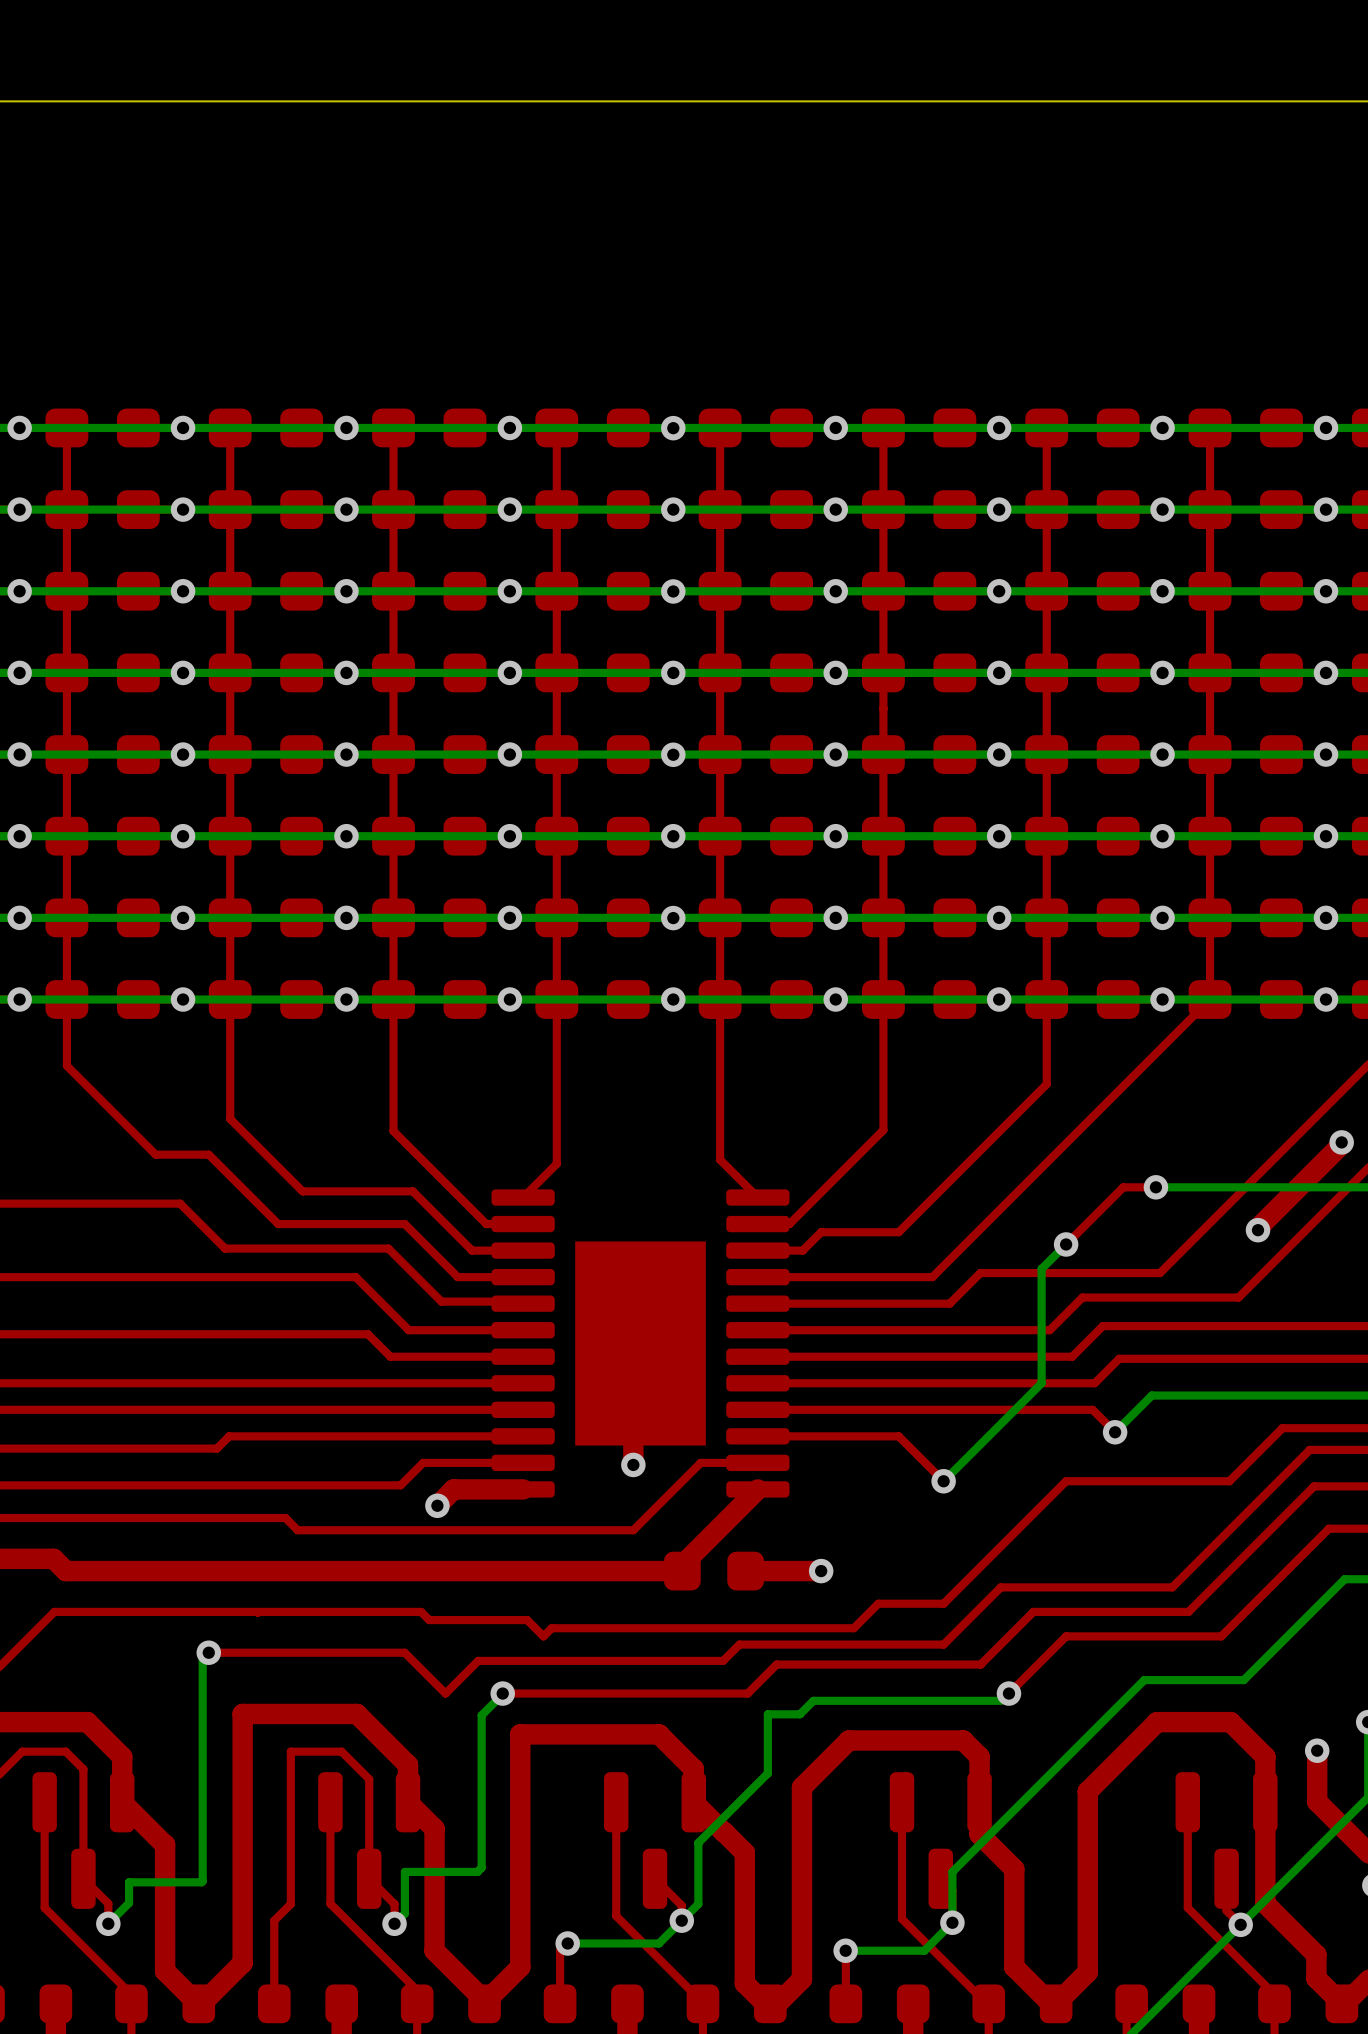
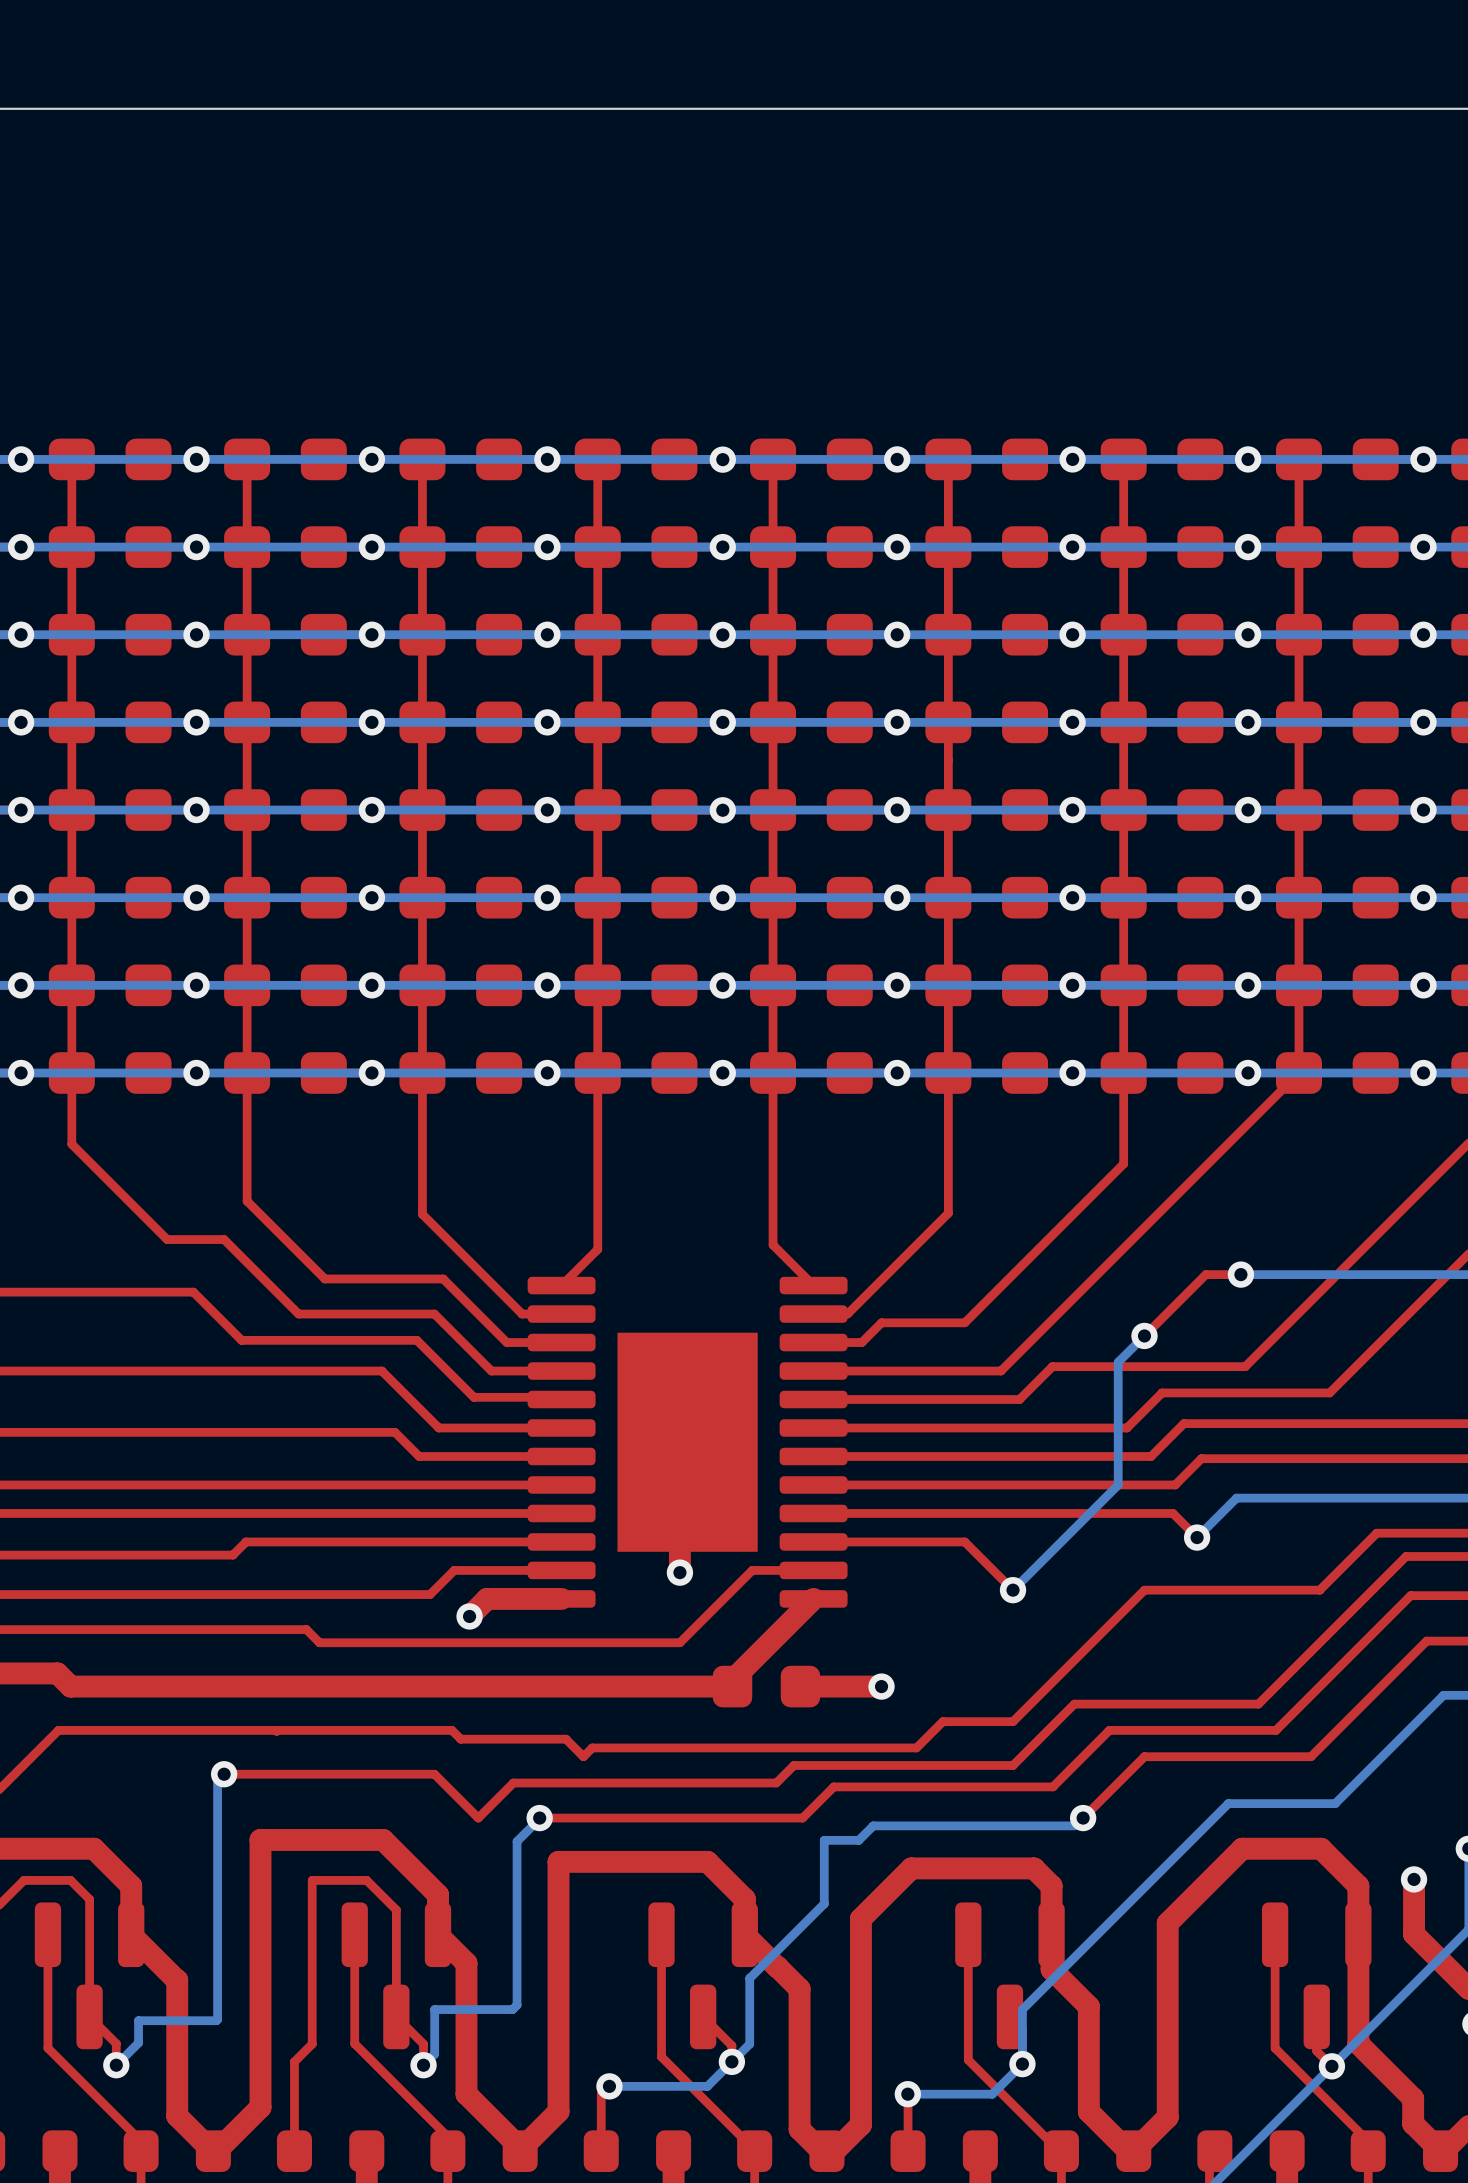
via: (1341, 1142) -> none
top track: (1341, 1144) (1258, 1228) -> none
via: (1258, 1230) -> none

